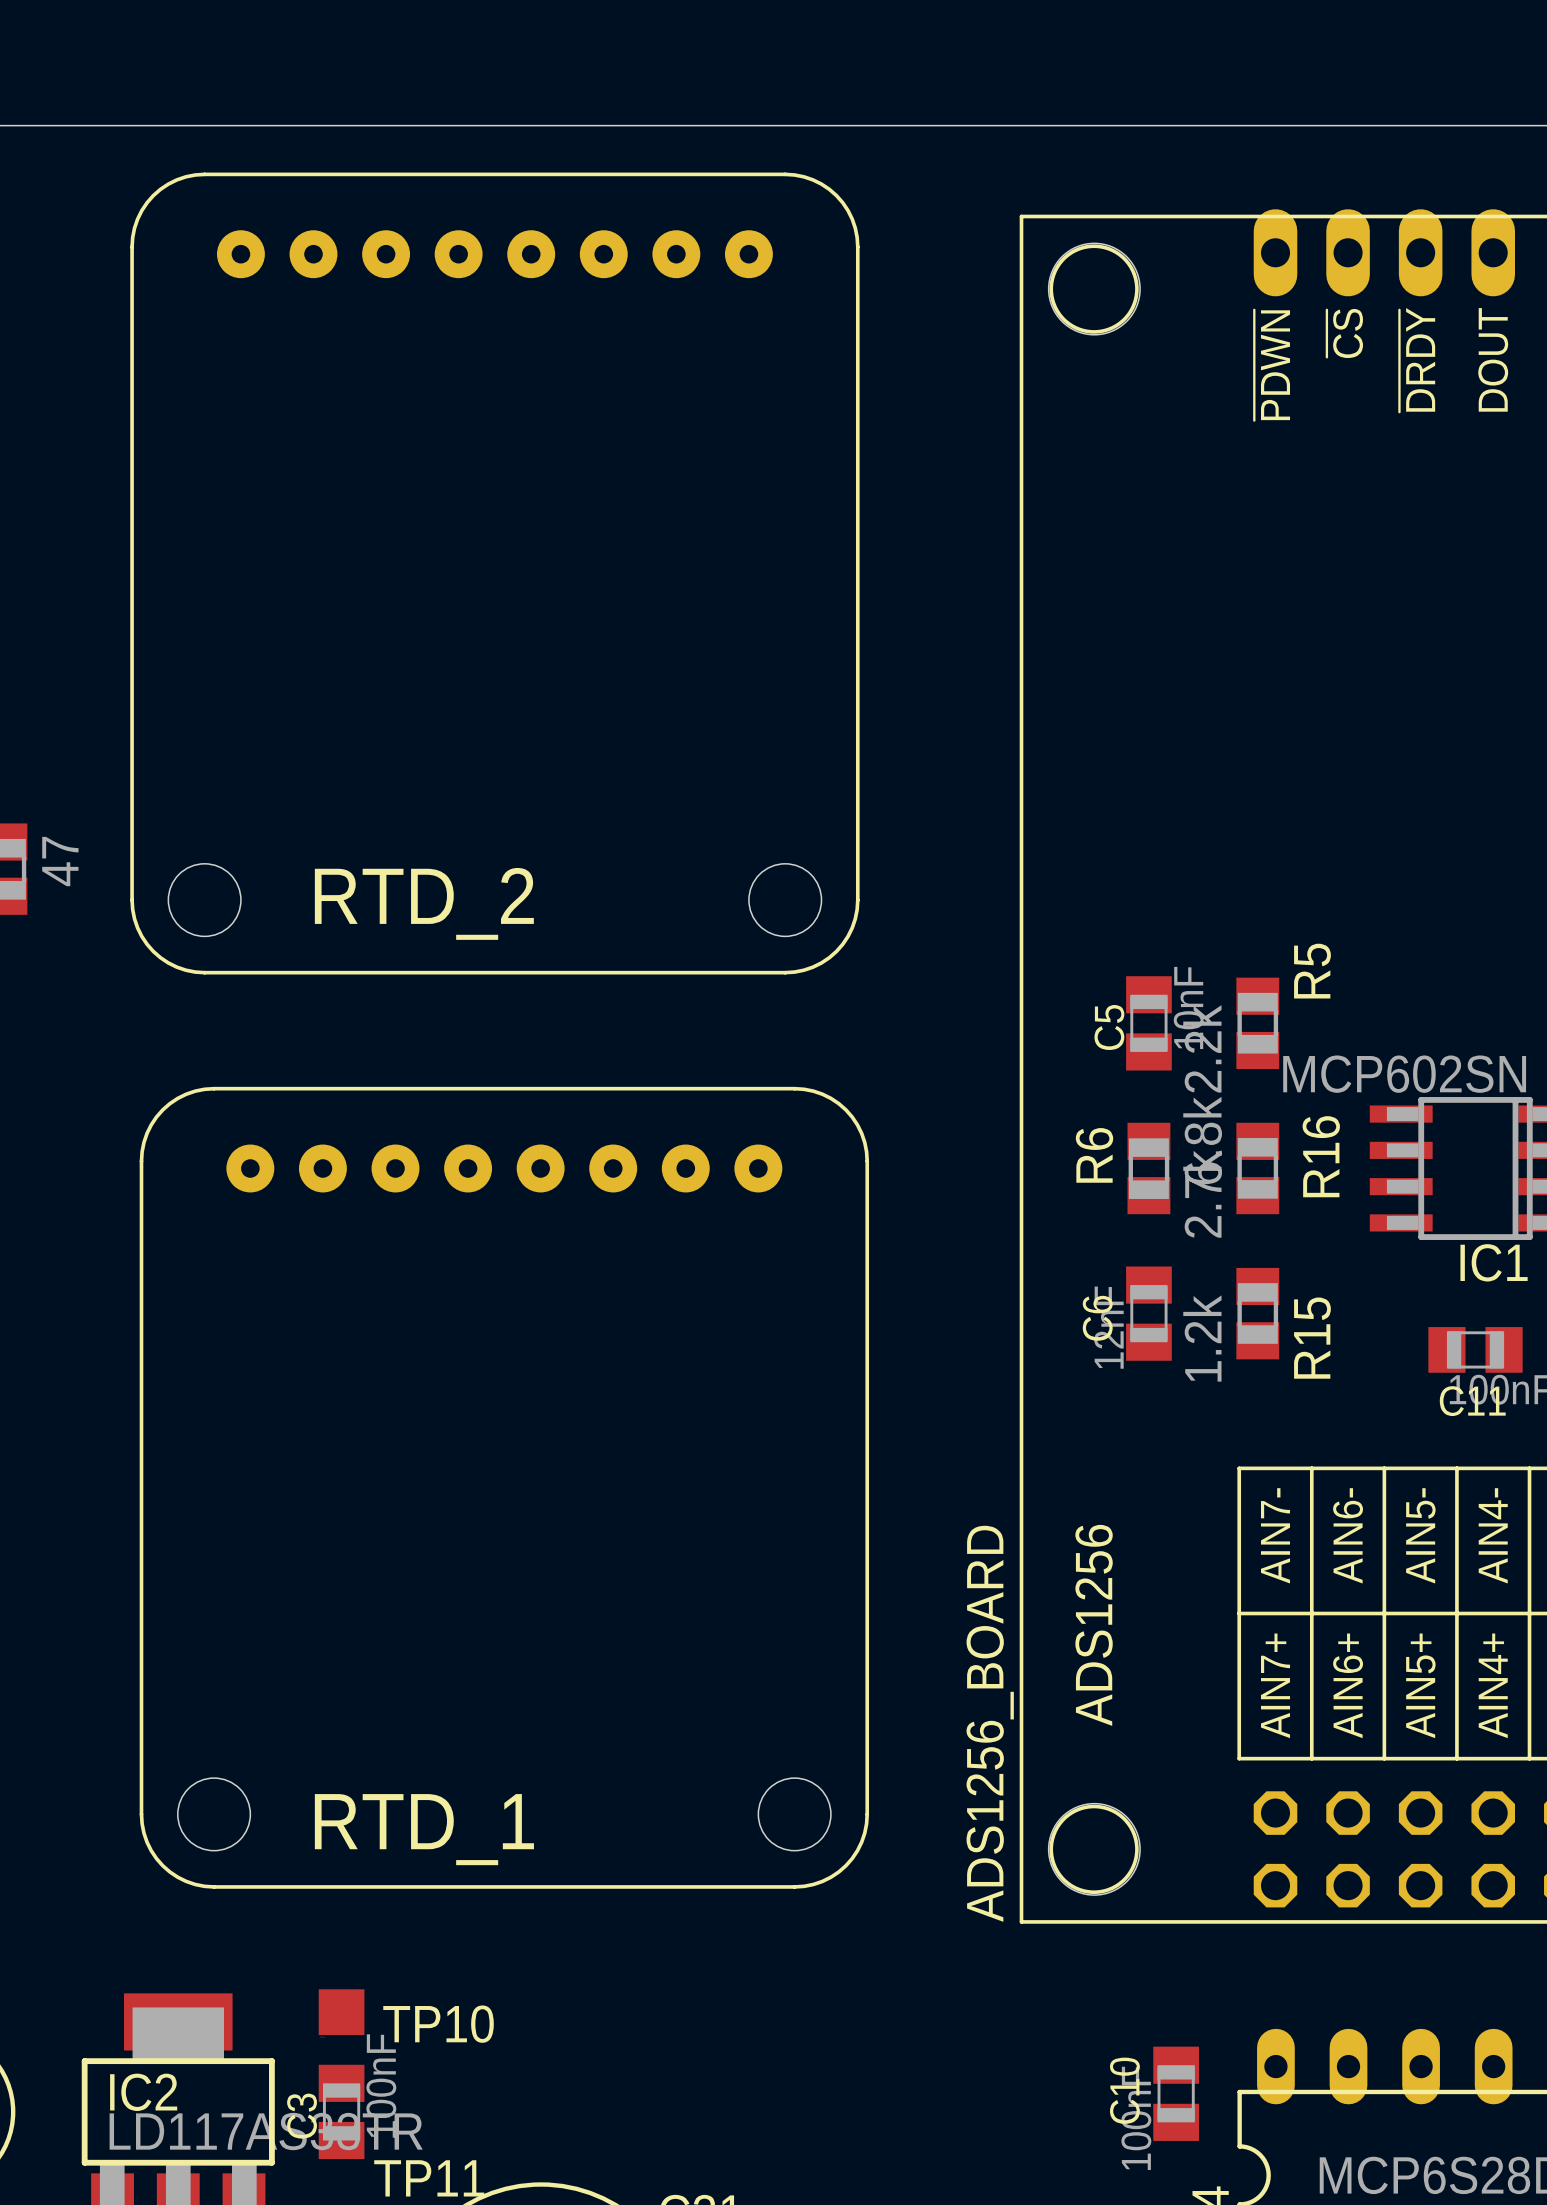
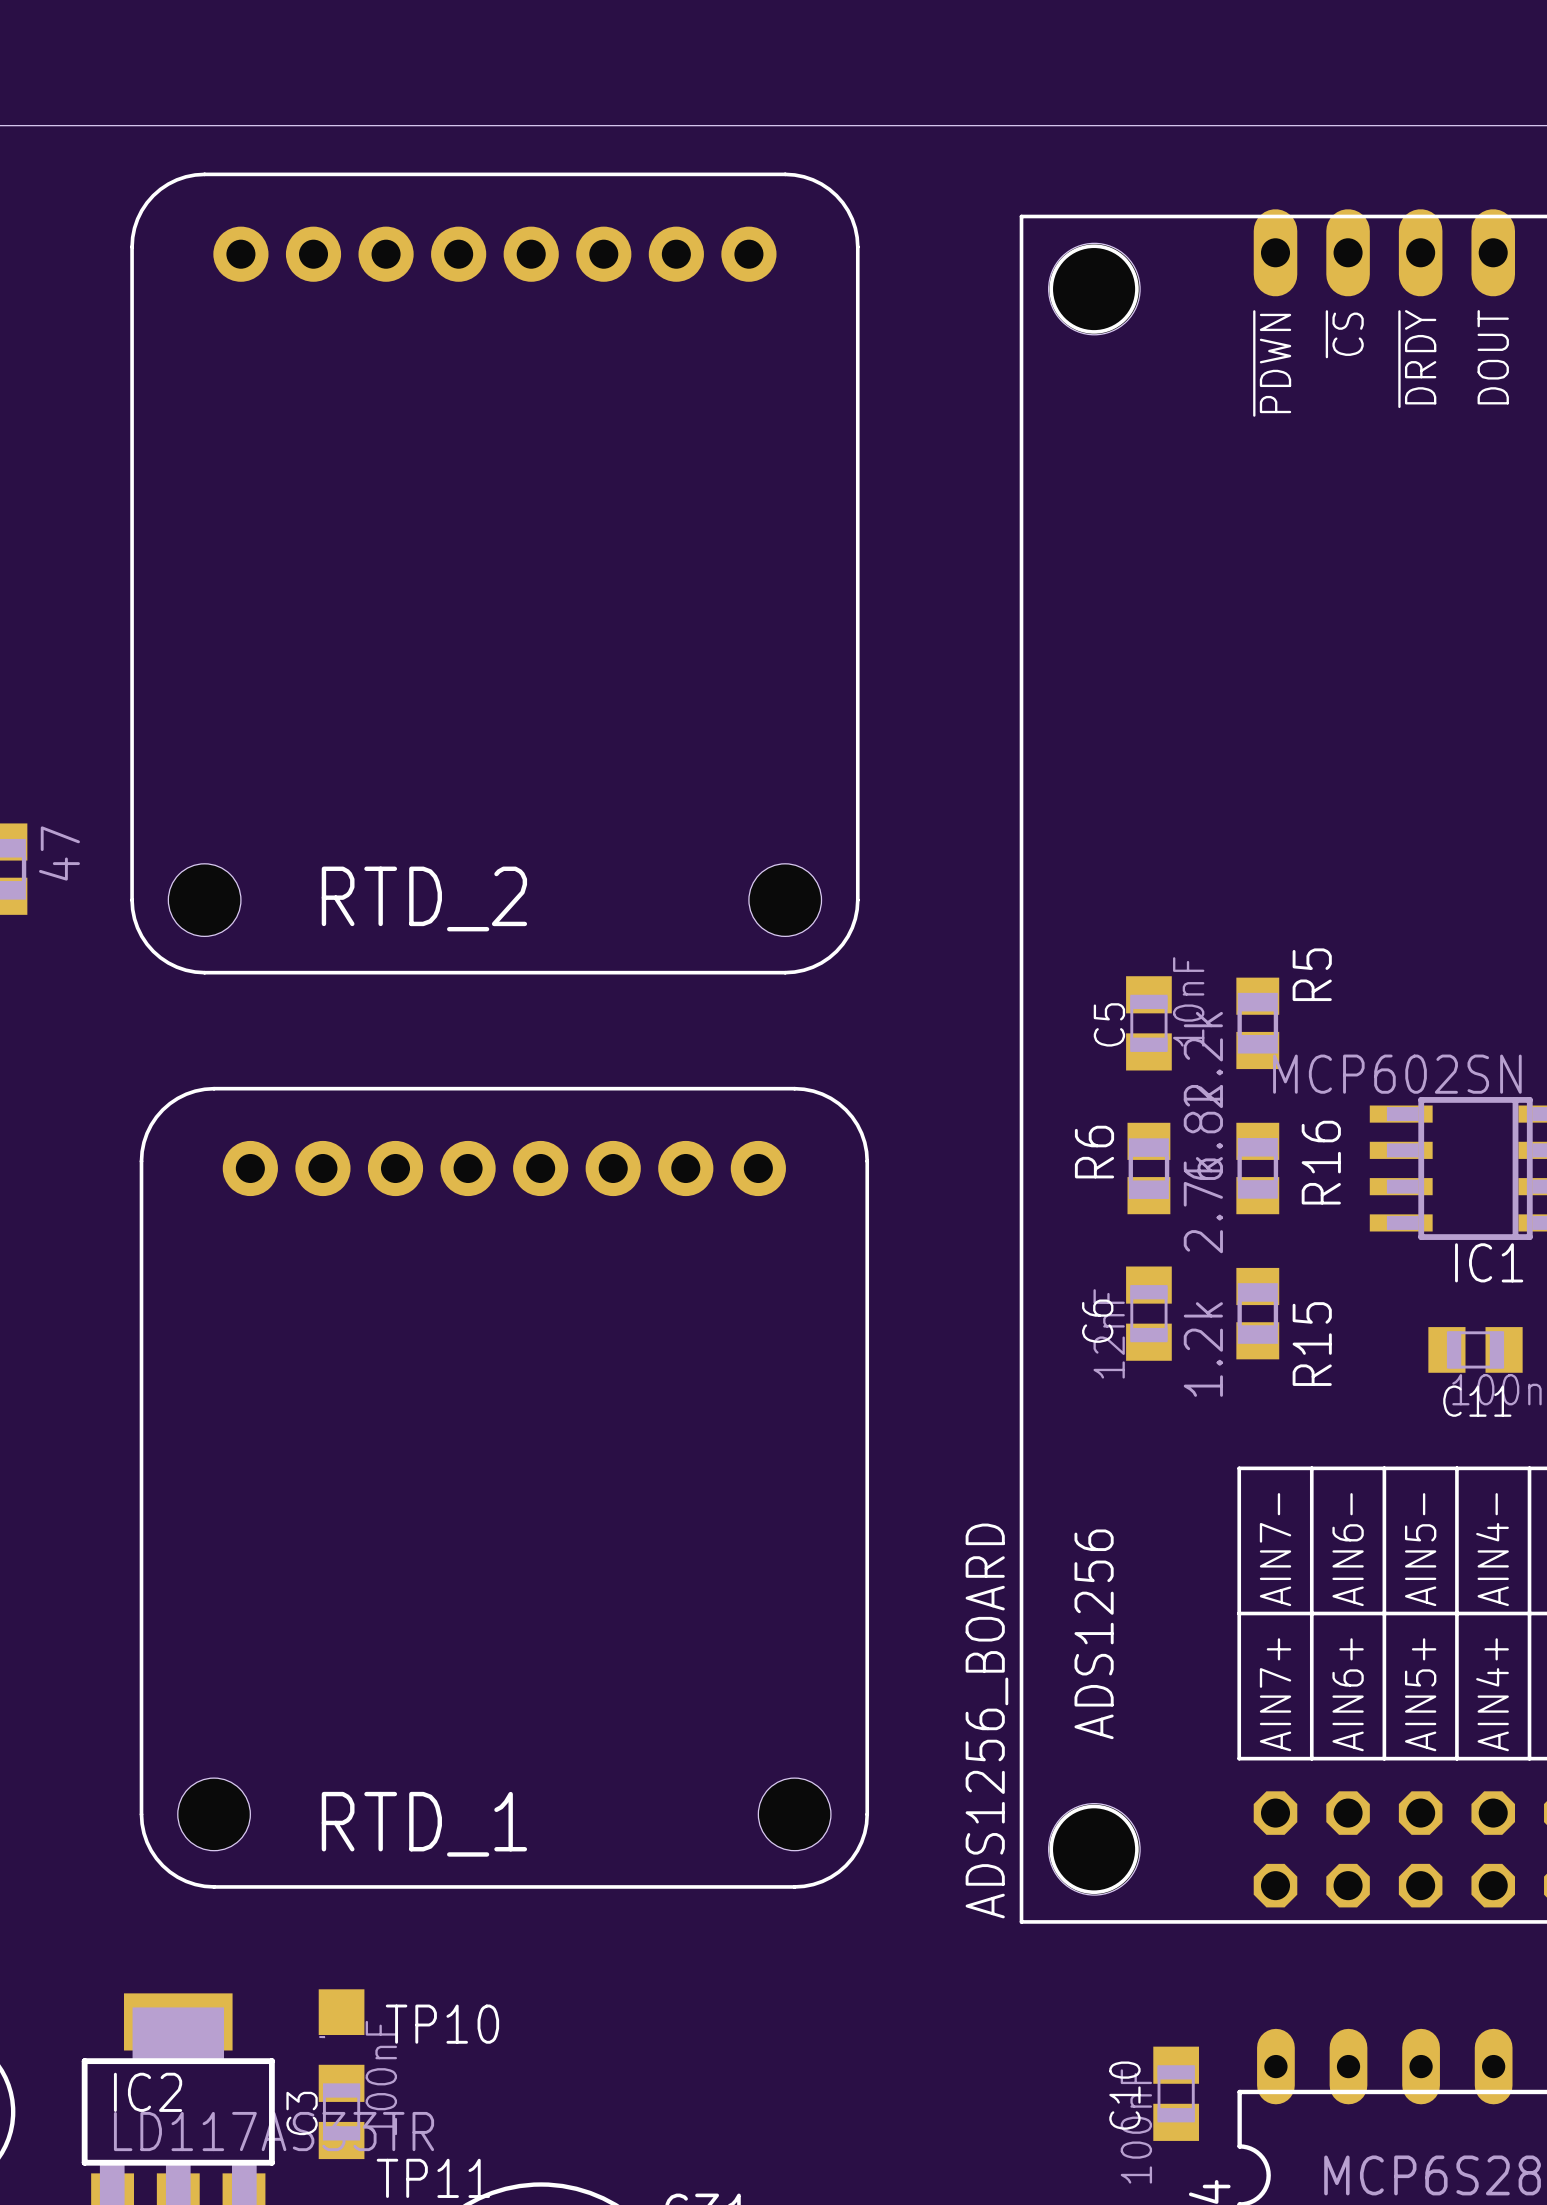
part footprint: [130, 172, 860, 975] -> [130, 172, 860, 975]
part footprint: [139, 1086, 870, 1889] -> [139, 1086, 870, 1889]

